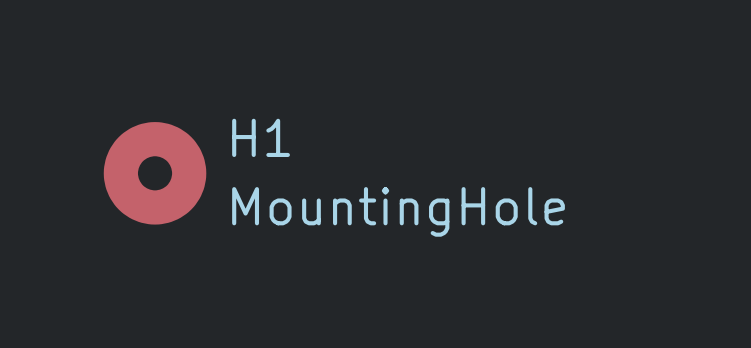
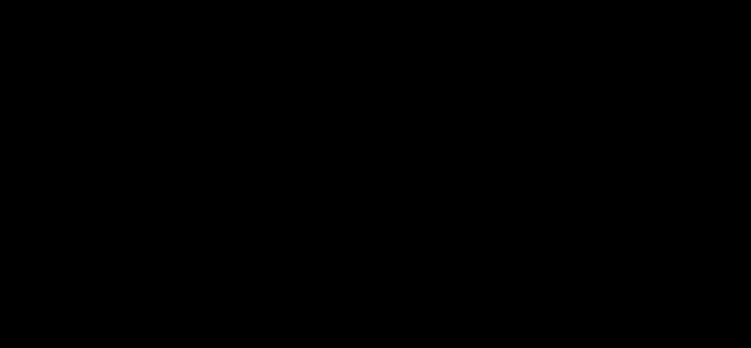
H1: MountingHole (155, 173) -> none

